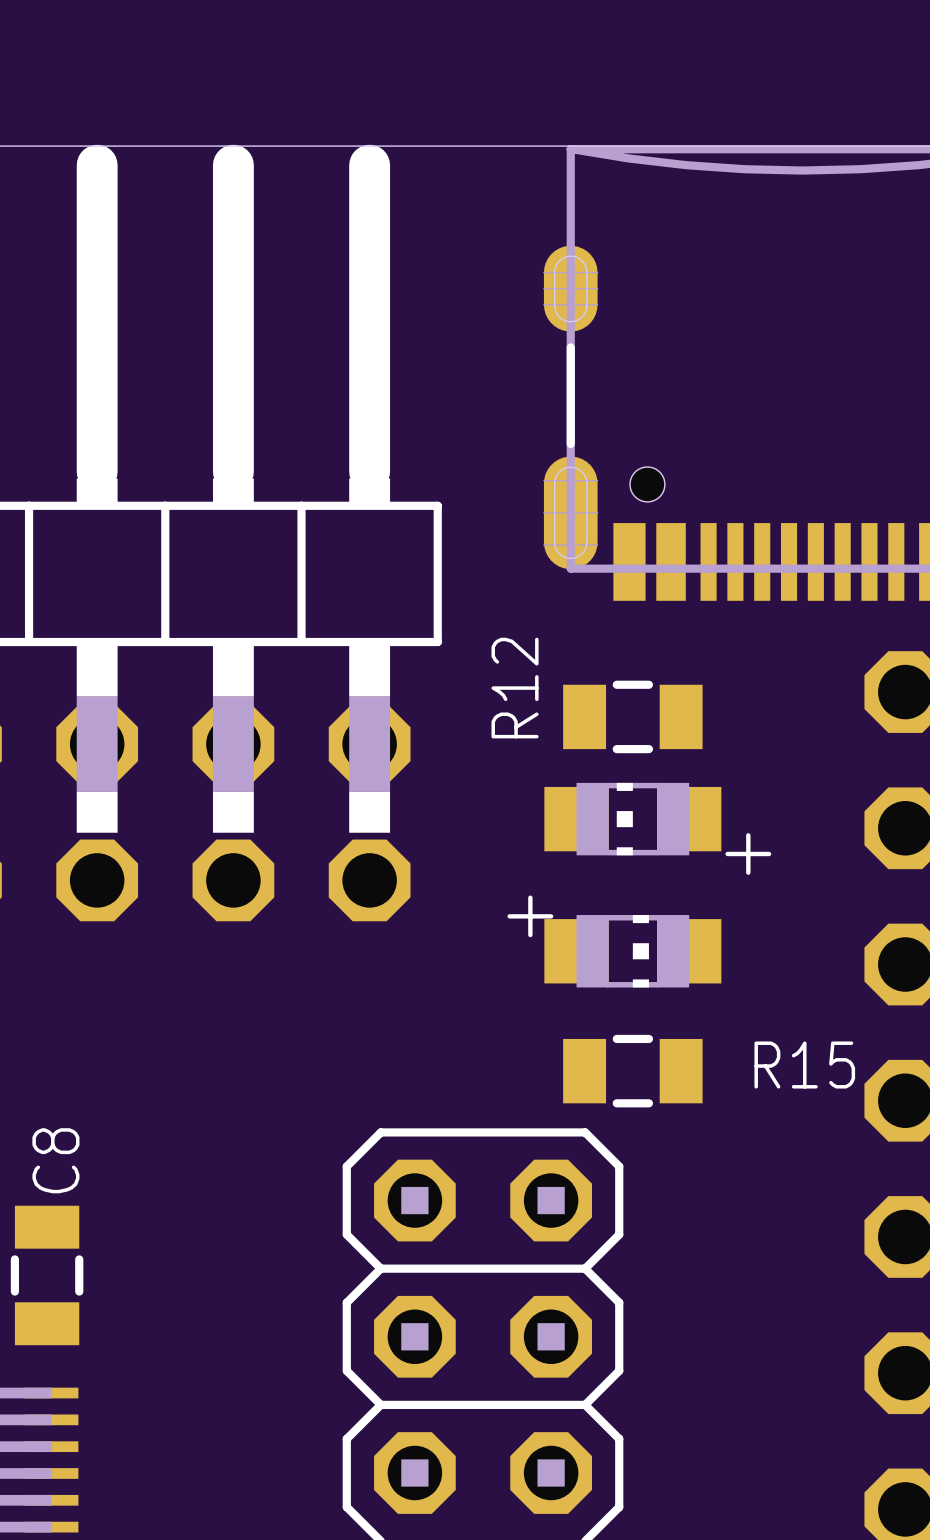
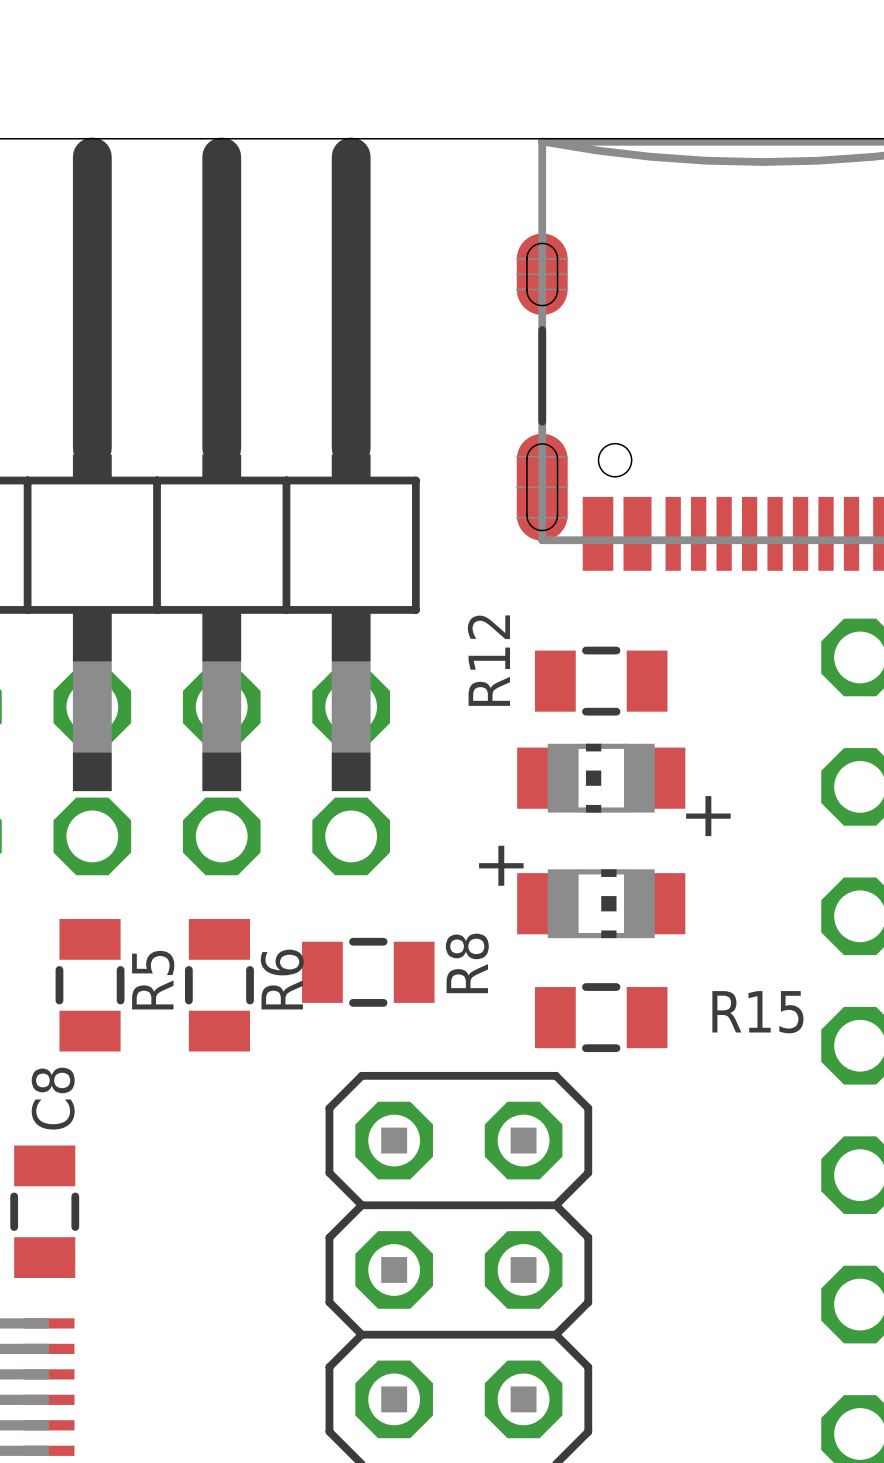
R8: none -> (368, 972)
R5: none -> (90, 985)
R6: none -> (219, 985)

